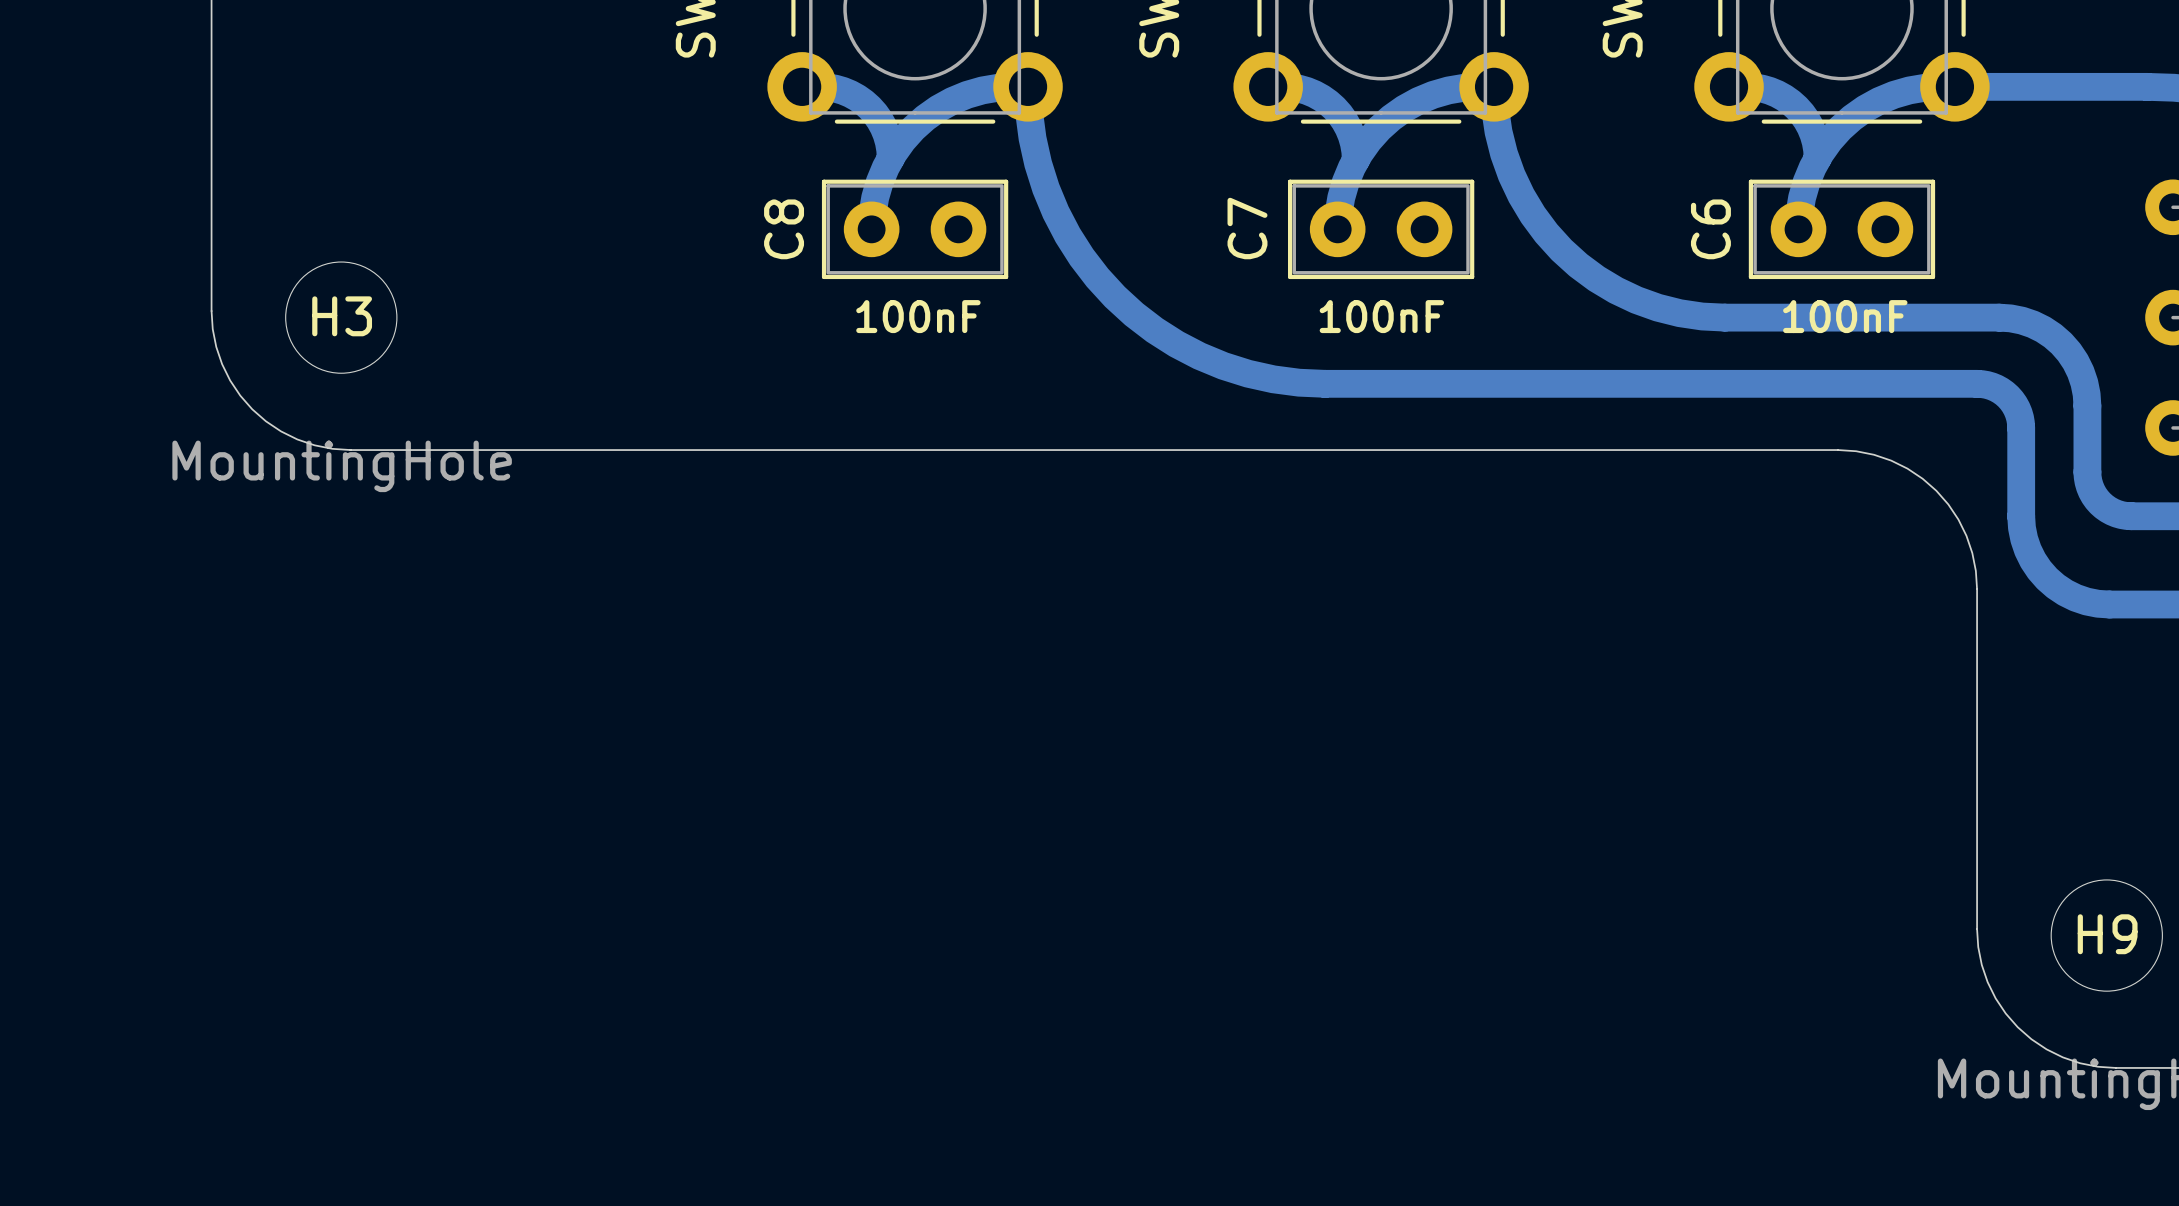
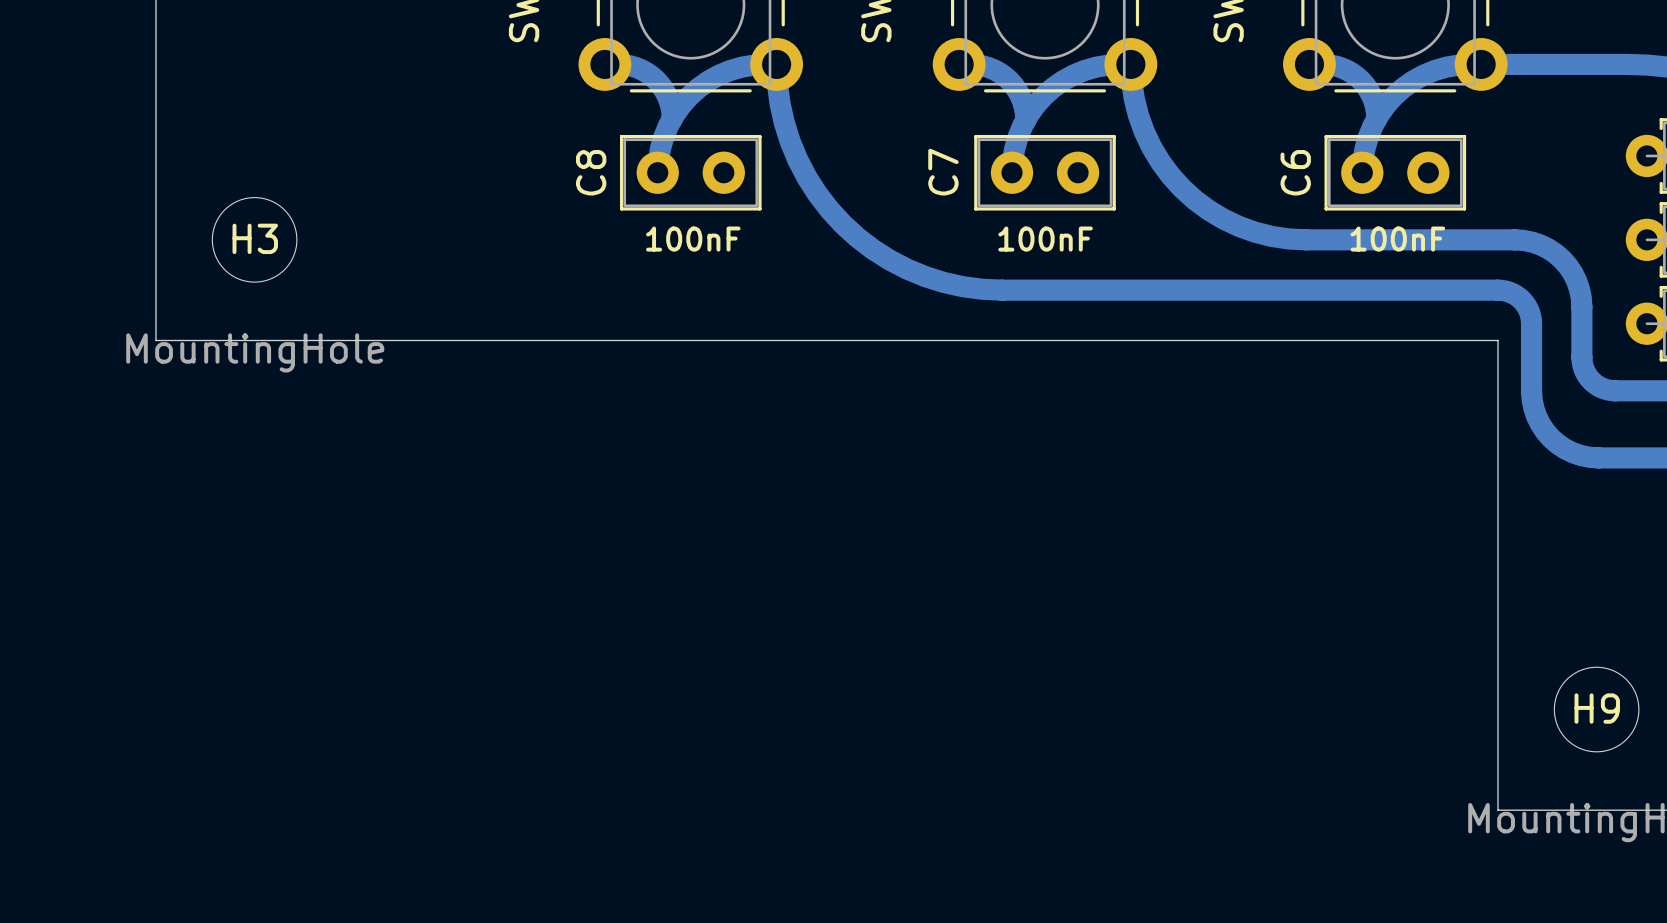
board edge: (211, 311) (216, 347) (222, 364) (230, 380) (252, 409) (281, 431) (297, 439) (314, 445) (350, 450) -> (156, 234) (156, 340) (261, 340)
board edge: (1838, 450) (1874, 454) (1891, 460) (1922, 478) (1936, 490) (1958, 519) (1966, 535) (1975, 570) (1977, 589) -> (1392, 340) (1498, 340) (1498, 446)
board edge: (1977, 928) (1978, 947) (1987, 982) (1995, 998) (2017, 1027) (2031, 1039) (2062, 1057) (2080, 1063) (2116, 1067) -> (1498, 704) (1498, 810) (1603, 810)

